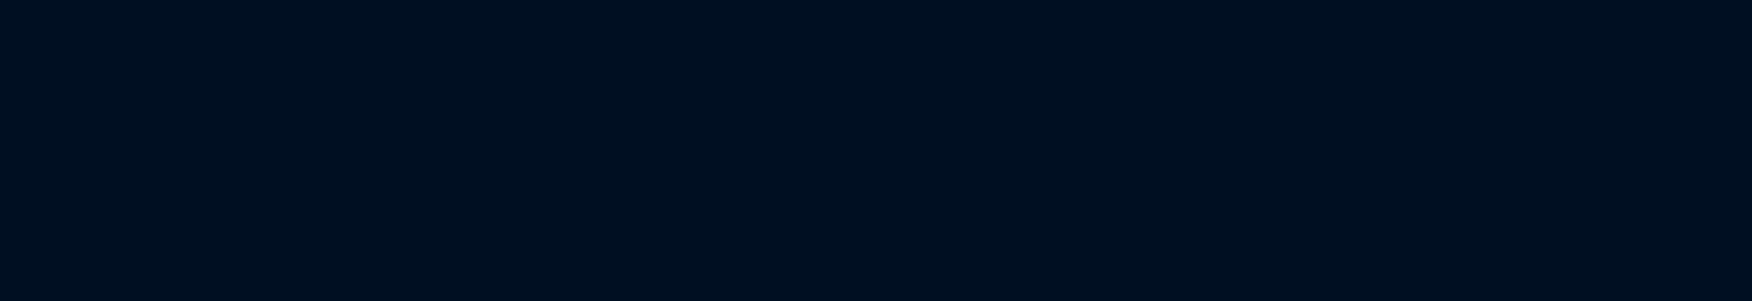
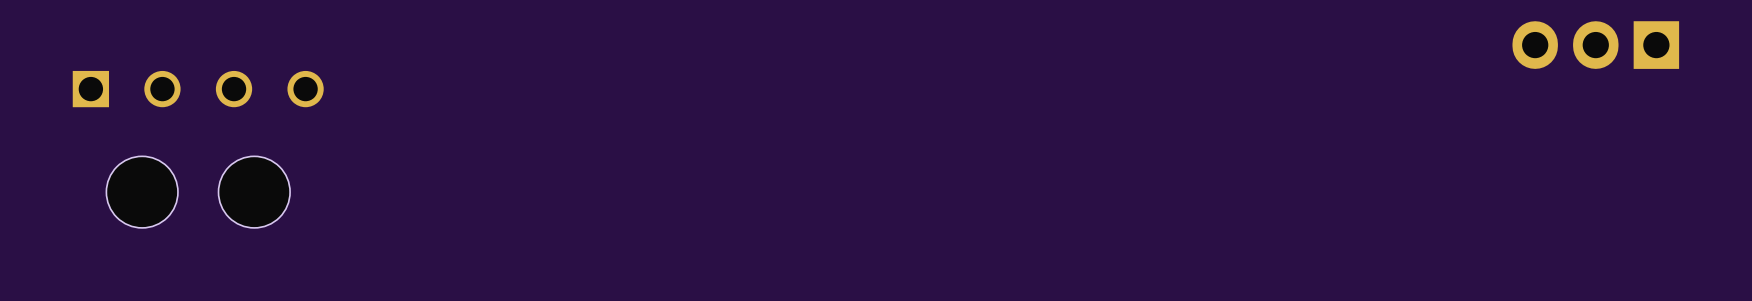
part: none -> (1595, 45)
part: none -> (198, 149)

